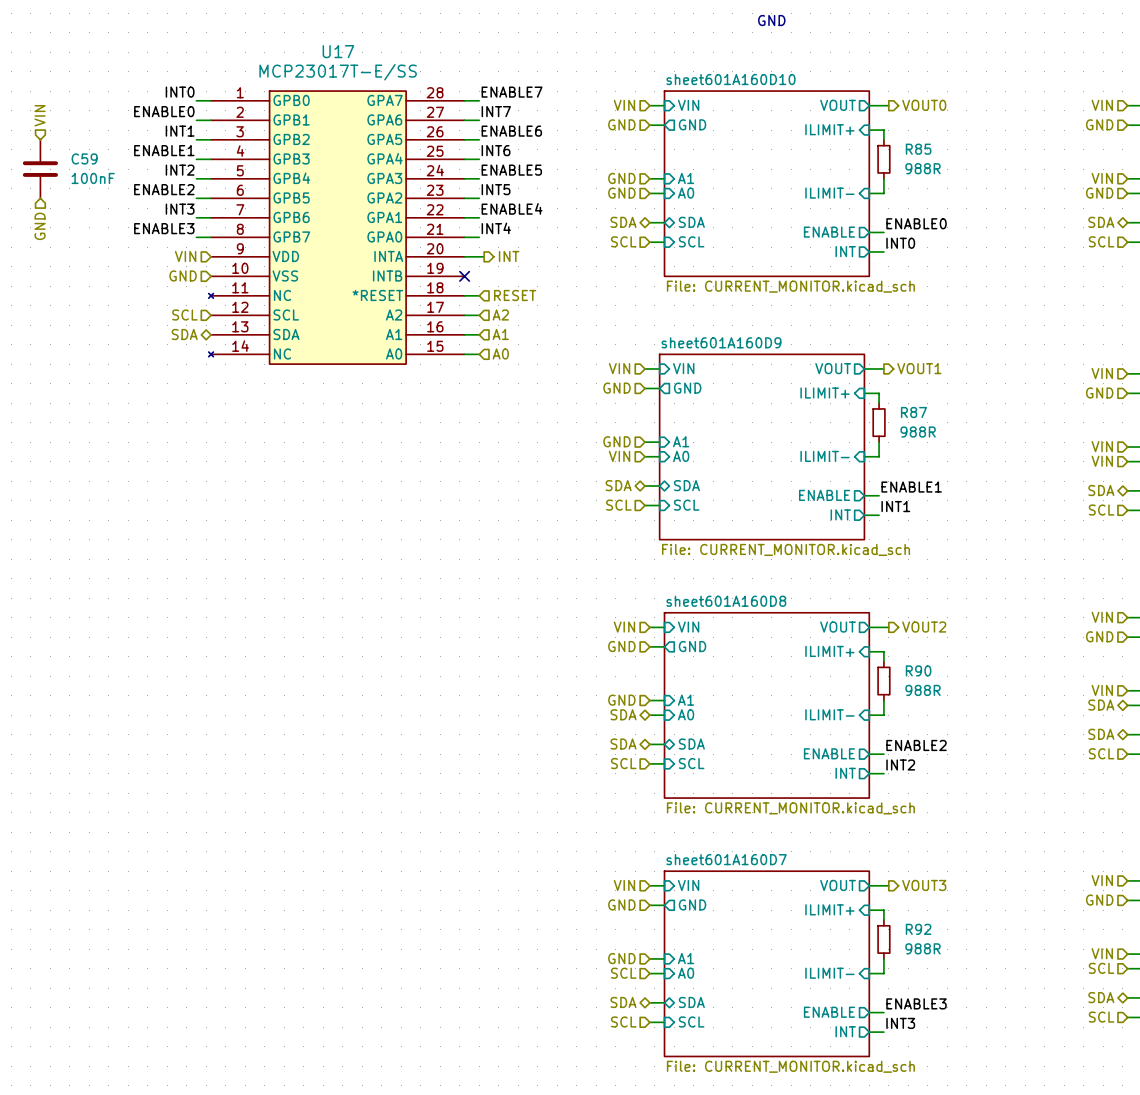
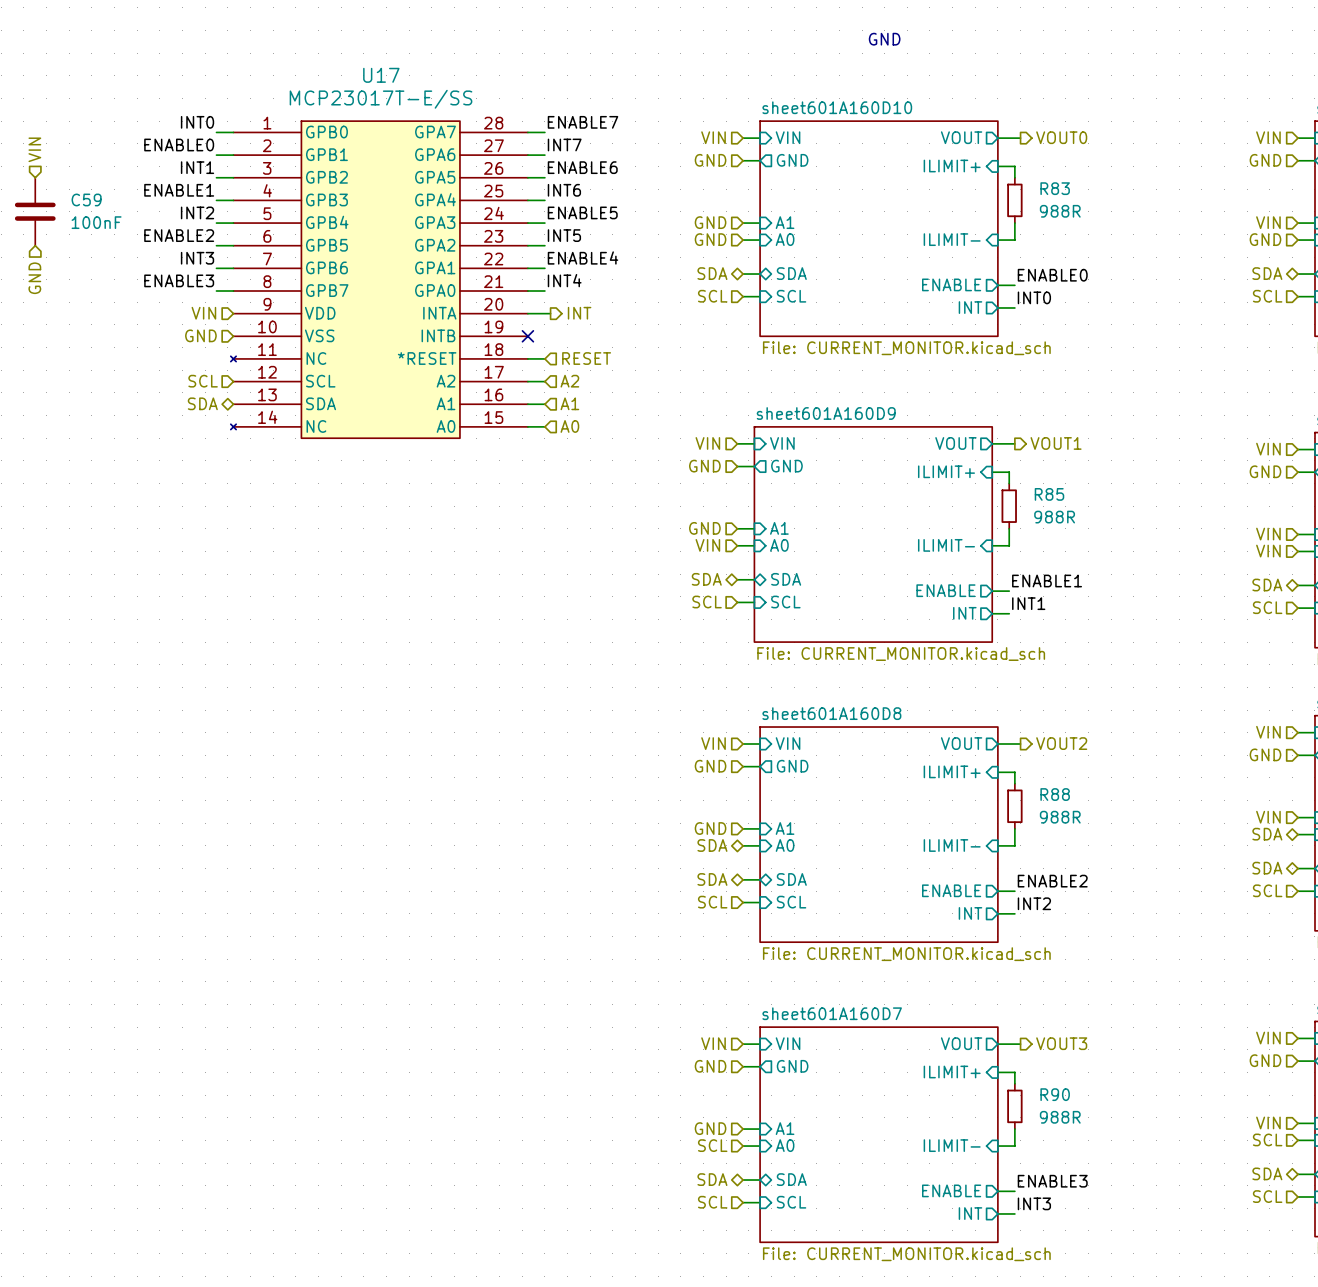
R85 name: R85 (918, 149) -> R83 (1055, 188)
R87 name: R87 (913, 412) -> R85 (1049, 494)
R90 name: R90 (918, 670) -> R88 (1055, 794)
R92 name: R92 (918, 929) -> R90 (1055, 1094)

